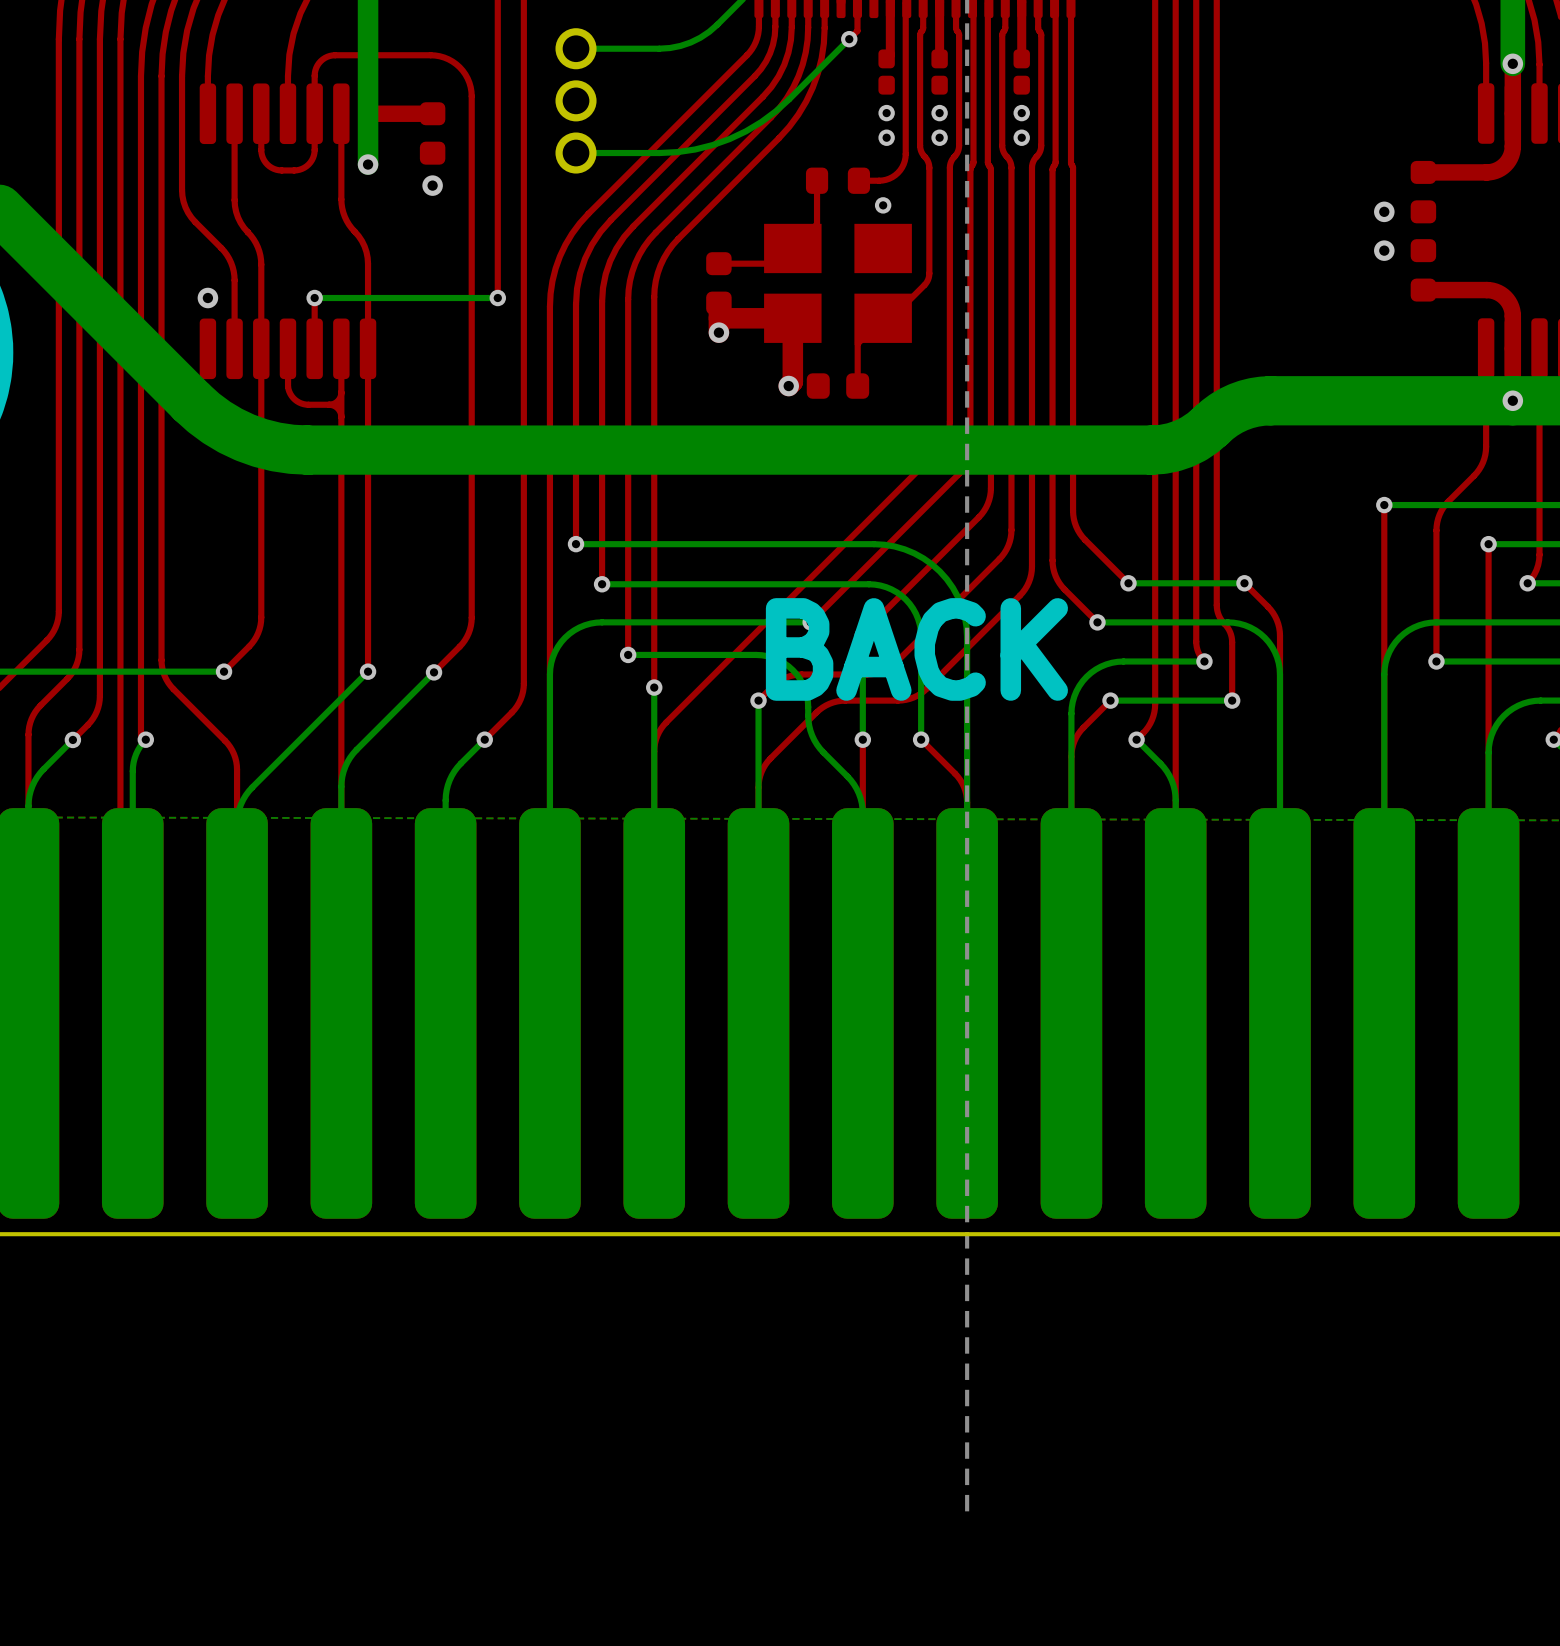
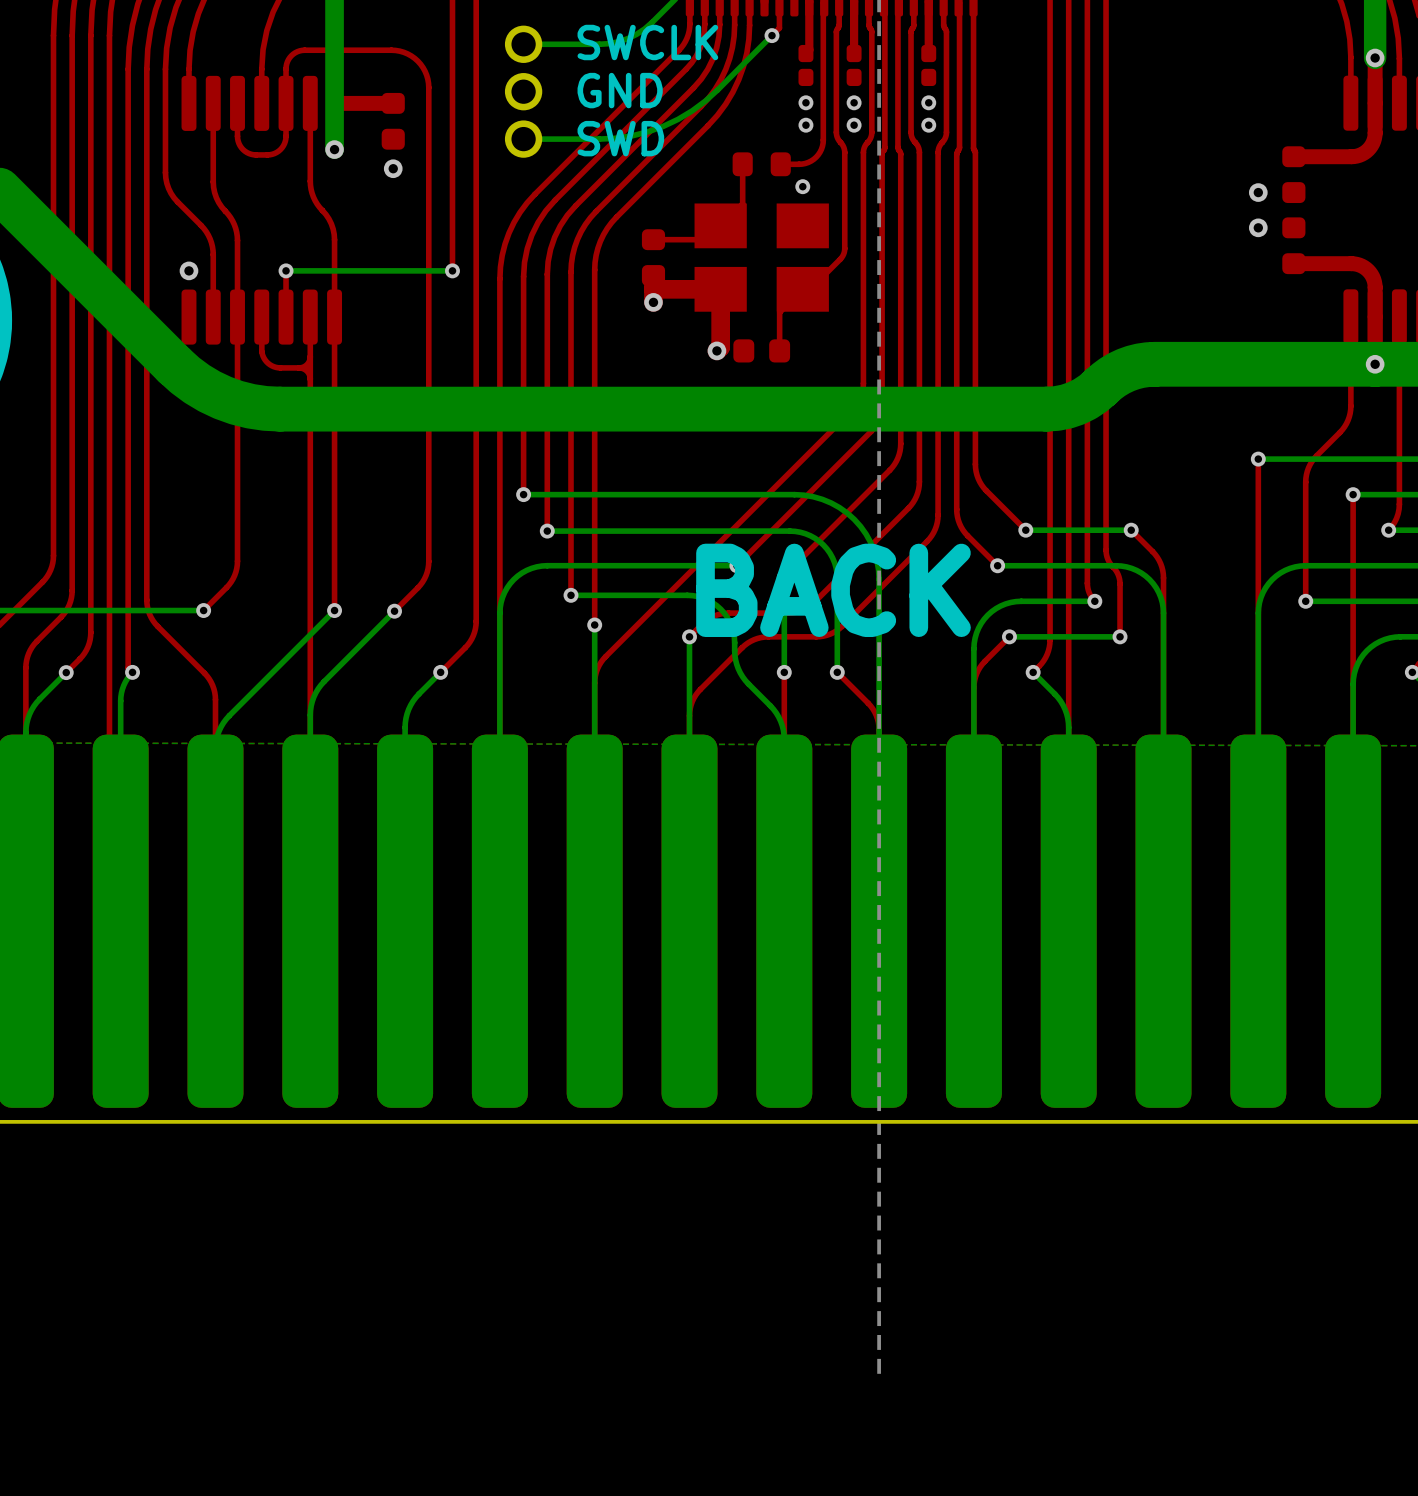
text: none -> SWCLK (647, 42)
text: none -> GND (620, 90)
text: none -> SWD (620, 138)

